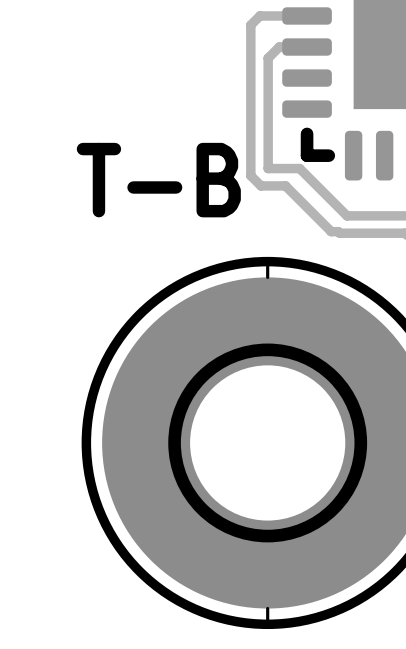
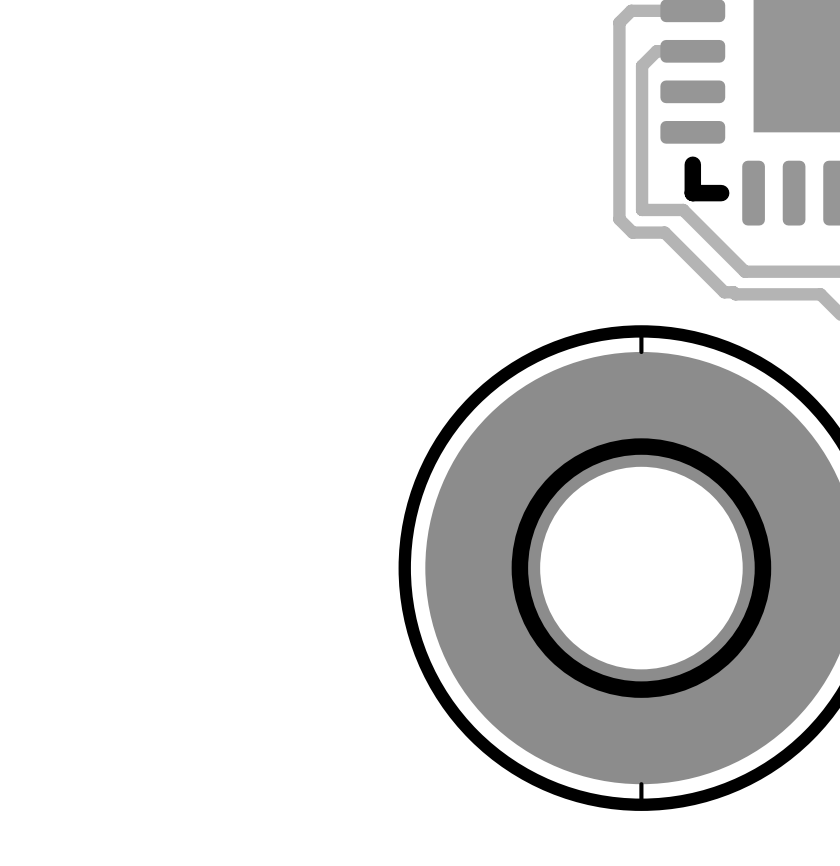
text: T-B (158, 180) -> none

